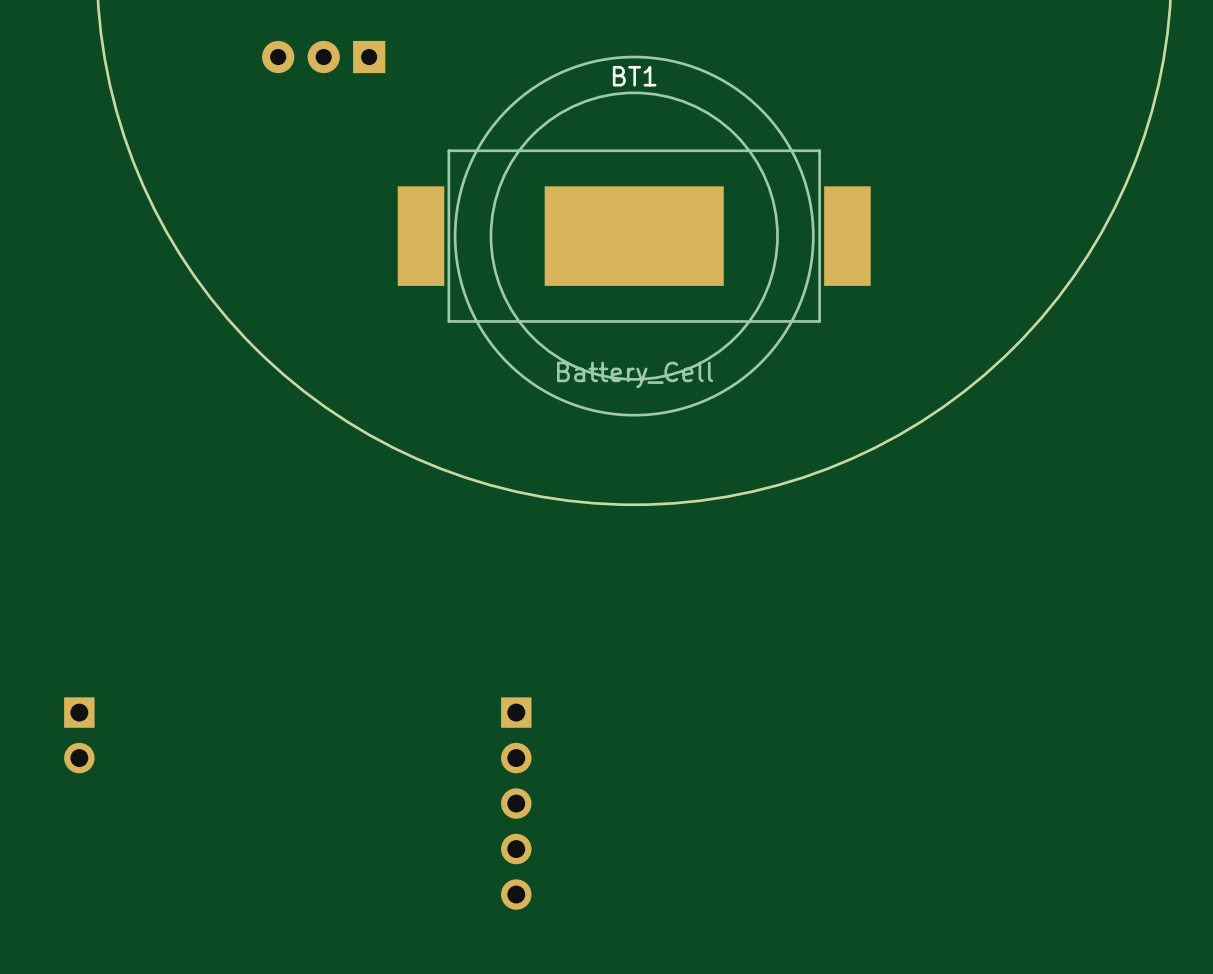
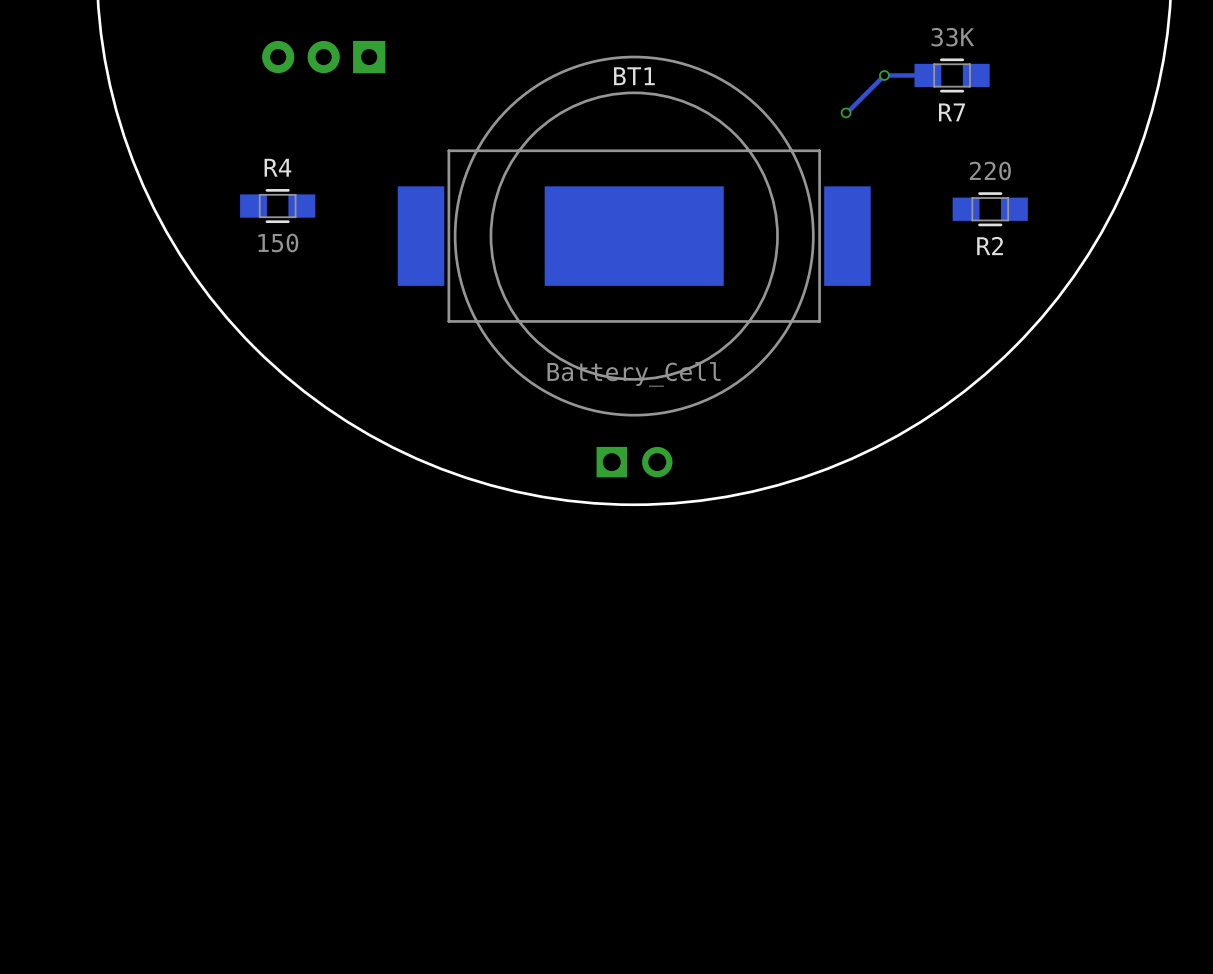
via: none -> (884, 75)
track: none -> (927, 75) (884, 75) (846, 112)
R7: none -> 33K (952, 75)
via: none -> (846, 112)
R4: none -> 150 (277, 206)
R2: none -> 220 (990, 209)
part: none -> (634, 462)
part: (79, 735) -> none
part: (516, 803) -> none

